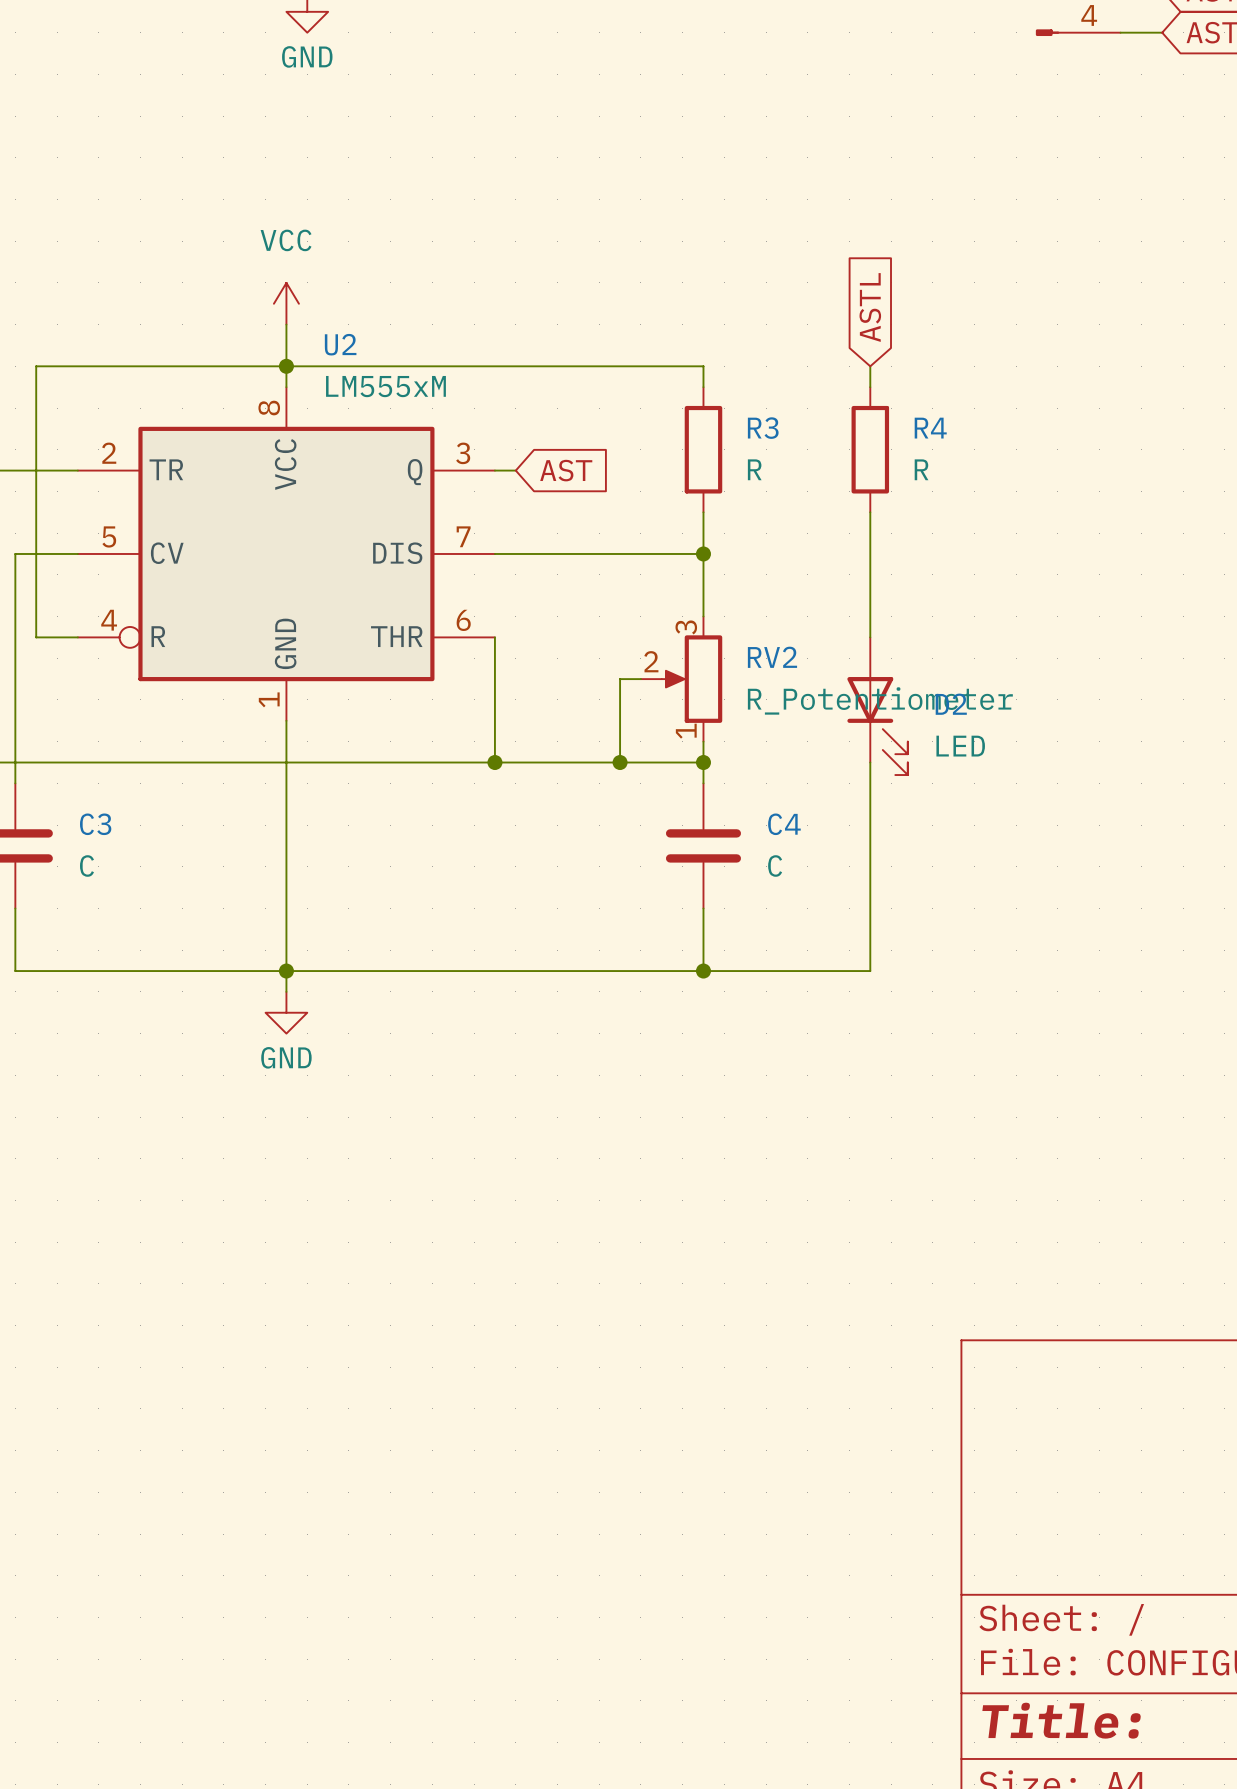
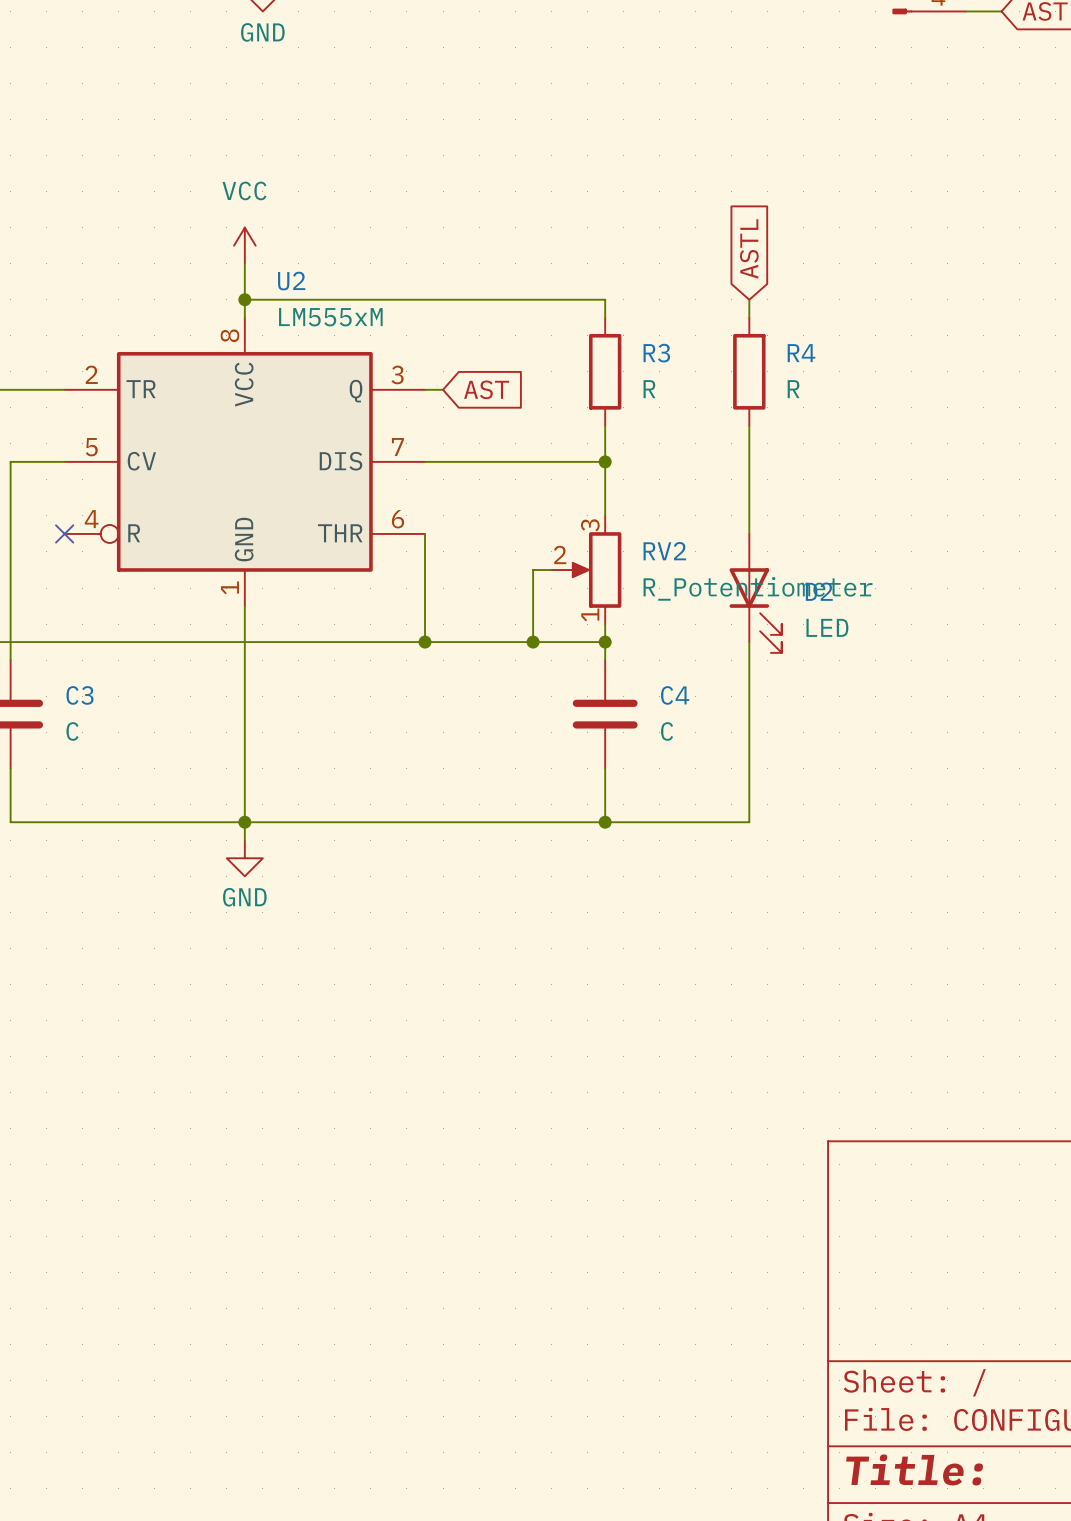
wire: (286, 366) (36, 366) (36, 637) (77, 637) -> none
no-connect mark: none -> (64, 533)

